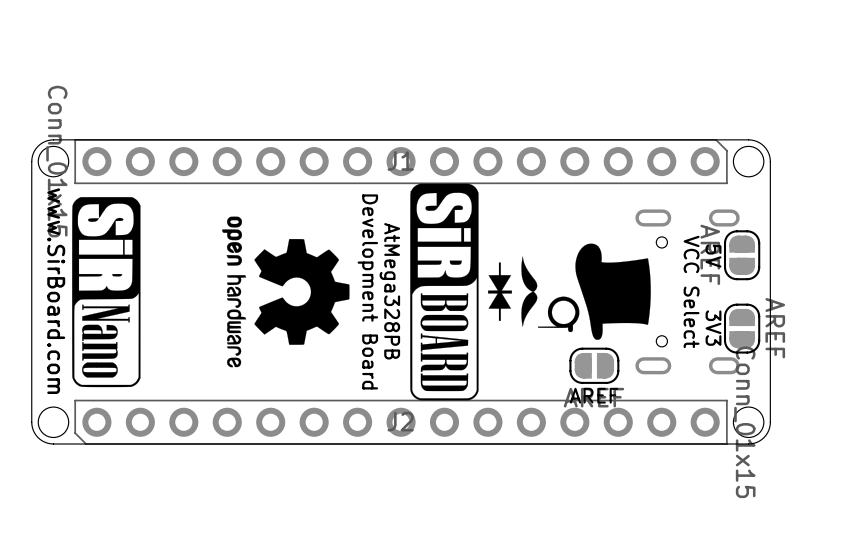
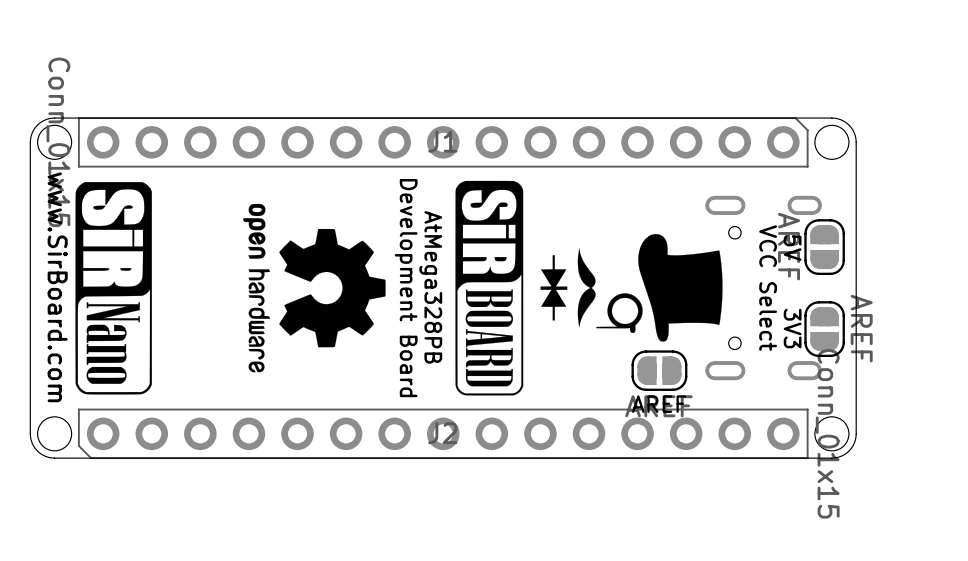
drawing shape: [410, 183, 479, 401] -> [455, 180, 524, 396]

